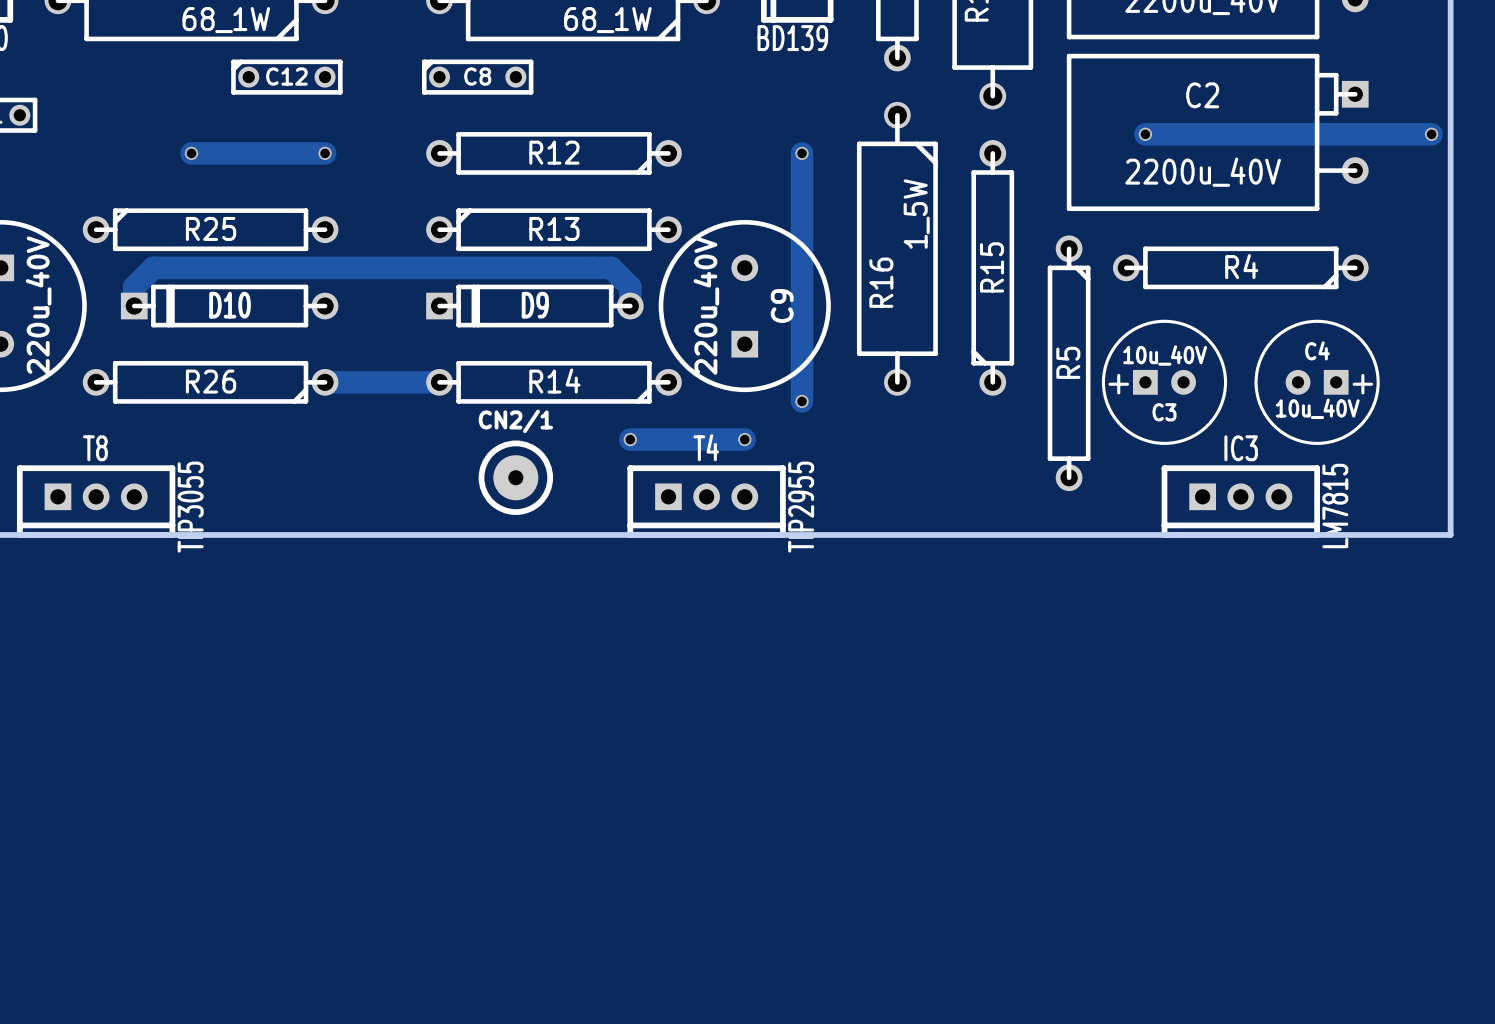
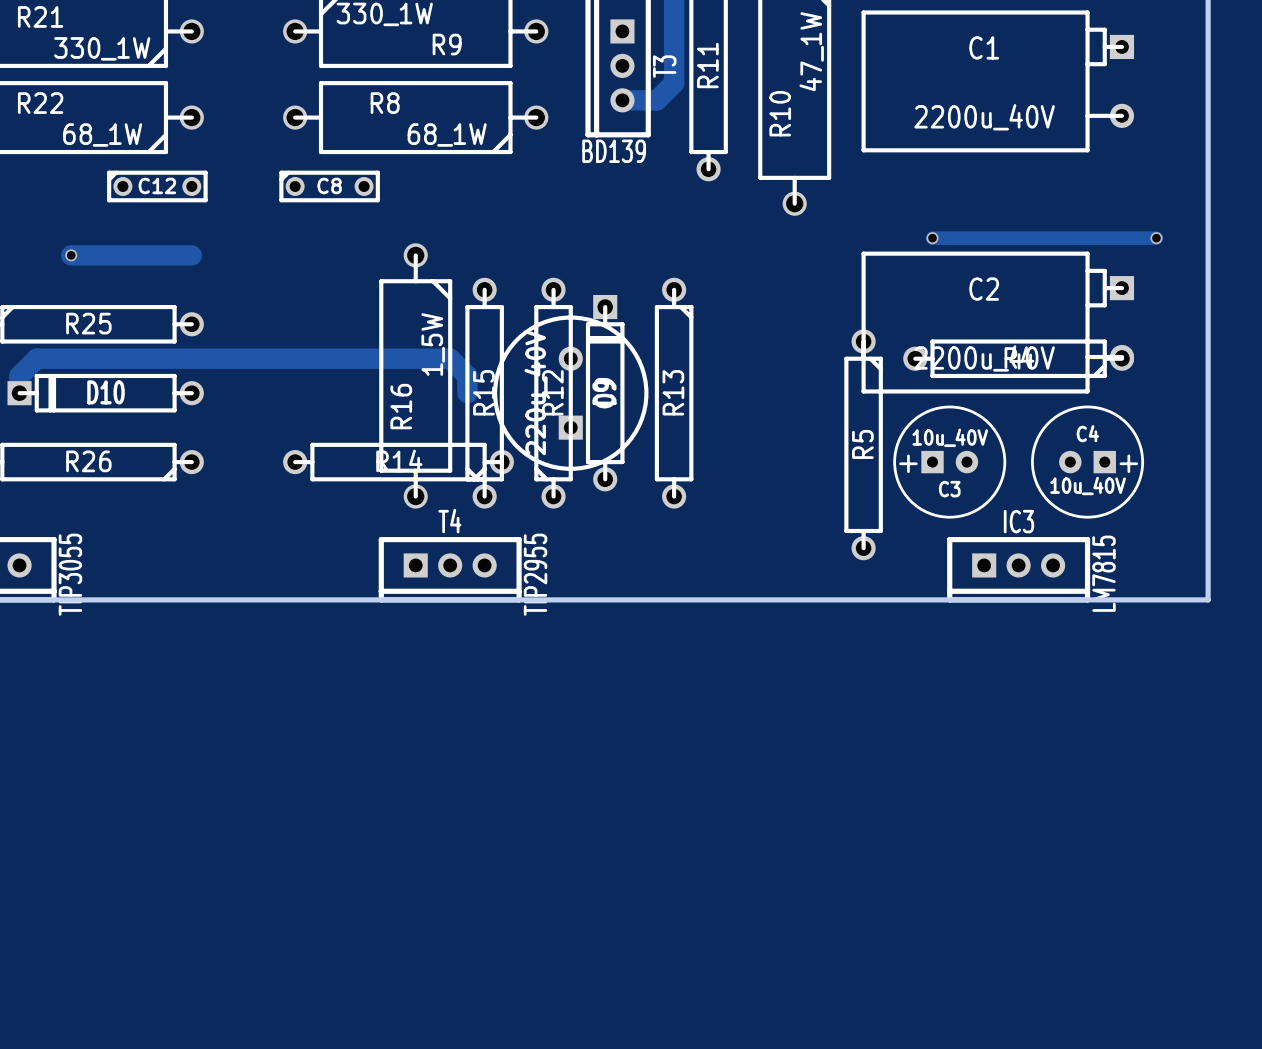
C2 position: (1217, 132) -> (997, 322)
track width: thick (1145, 134) (1393, 134) -> thin (932, 238) (1156, 238)
track: (1393, 134) (1431, 134) -> none
via position: (1431, 134) -> (1156, 238)
via: (325, 153) -> none
R12 rotation: 0° (553, 153) -> 90° clockwise (553, 393)
R12 position: (553, 153) -> (553, 393)
track: (802, 153) (802, 401) -> none
via: (802, 153) -> none
R13 rotation: 0° (553, 229) -> 90° clockwise (674, 393)
R13 position: (553, 229) -> (674, 393)
R16 position: (897, 248) -> (415, 375)
R15 position: (992, 267) -> (484, 393)
D9 rotation: 0° (534, 306) -> 90° clockwise (605, 393)
D9 position: (534, 306) -> (605, 393)
track: (325, 382) (439, 382) -> none
via: (802, 401) -> none
track: (630, 439) (744, 439) -> none
via: (630, 439) -> none
via: (744, 439) -> none
part: CN2/1 (515, 477) -> none
T4 position: (706, 501) -> (450, 569)

